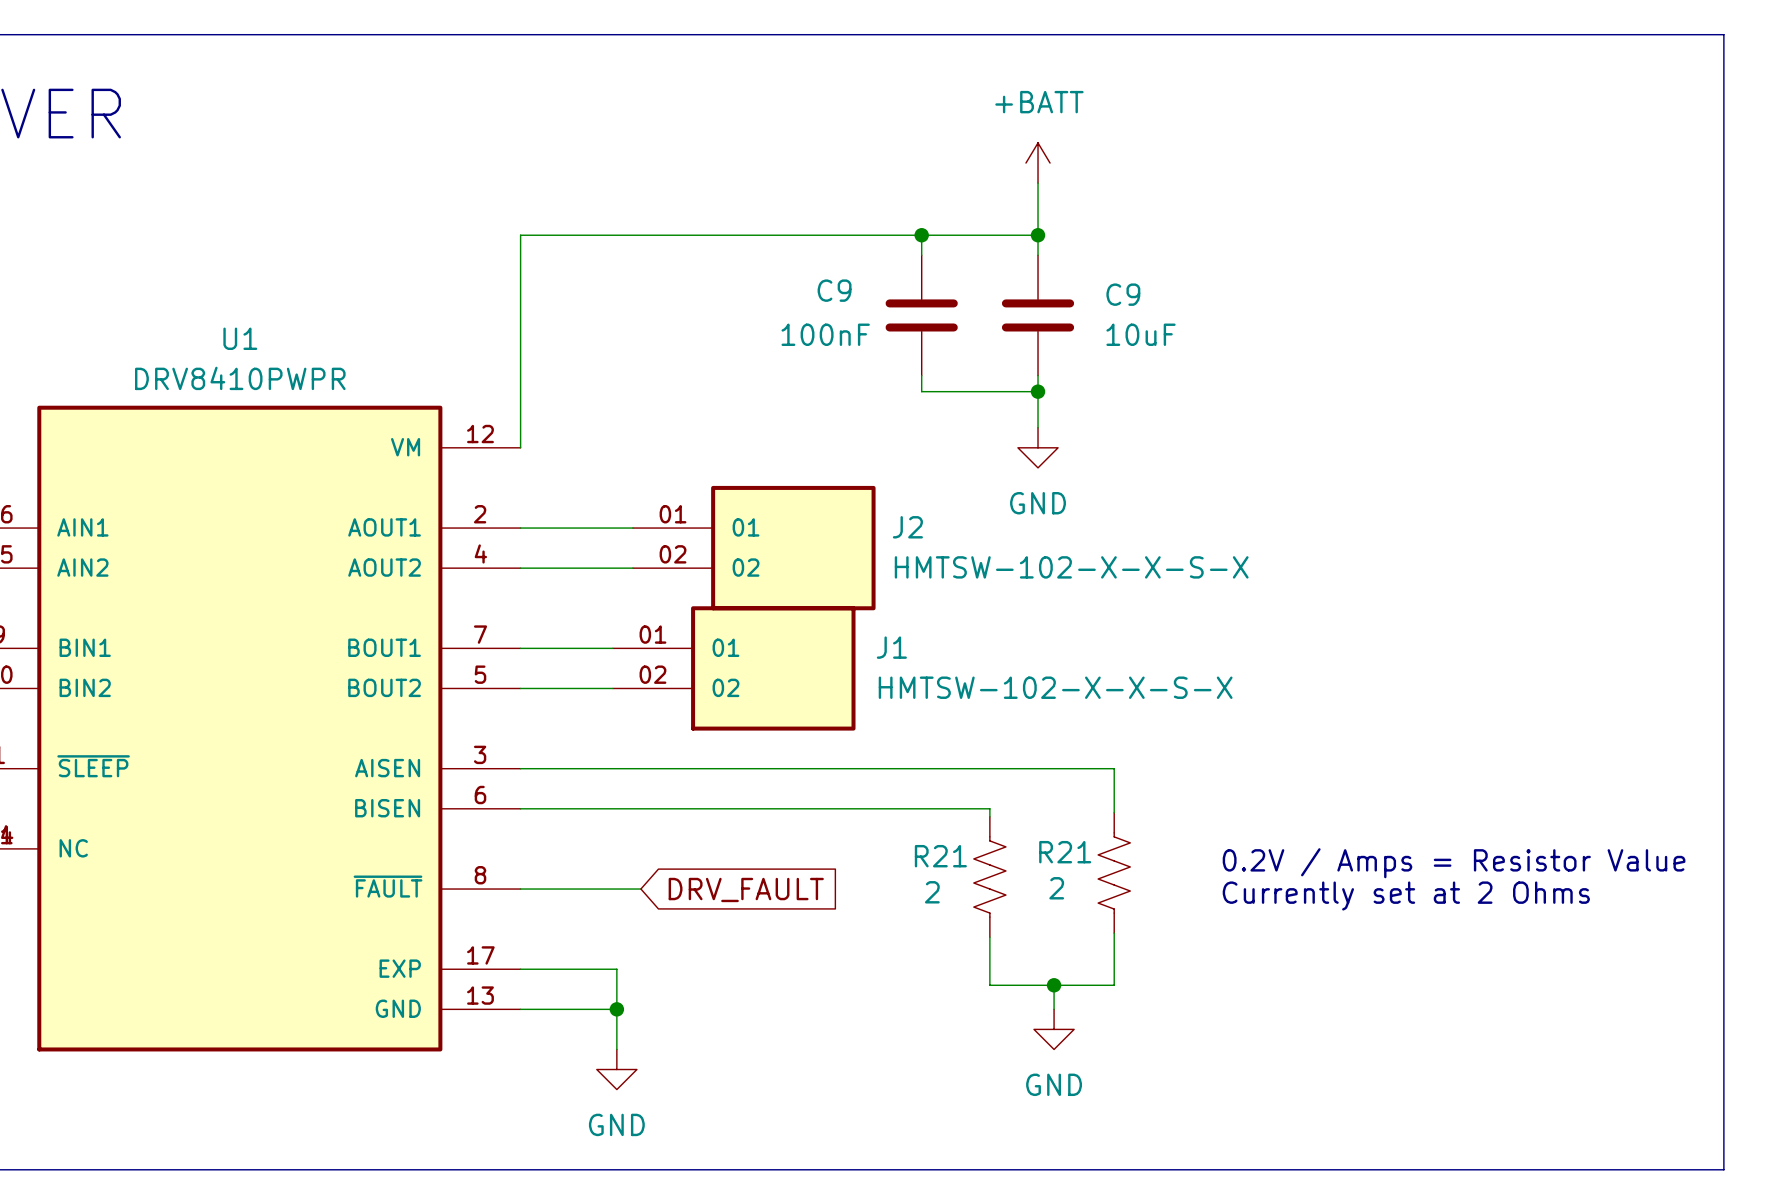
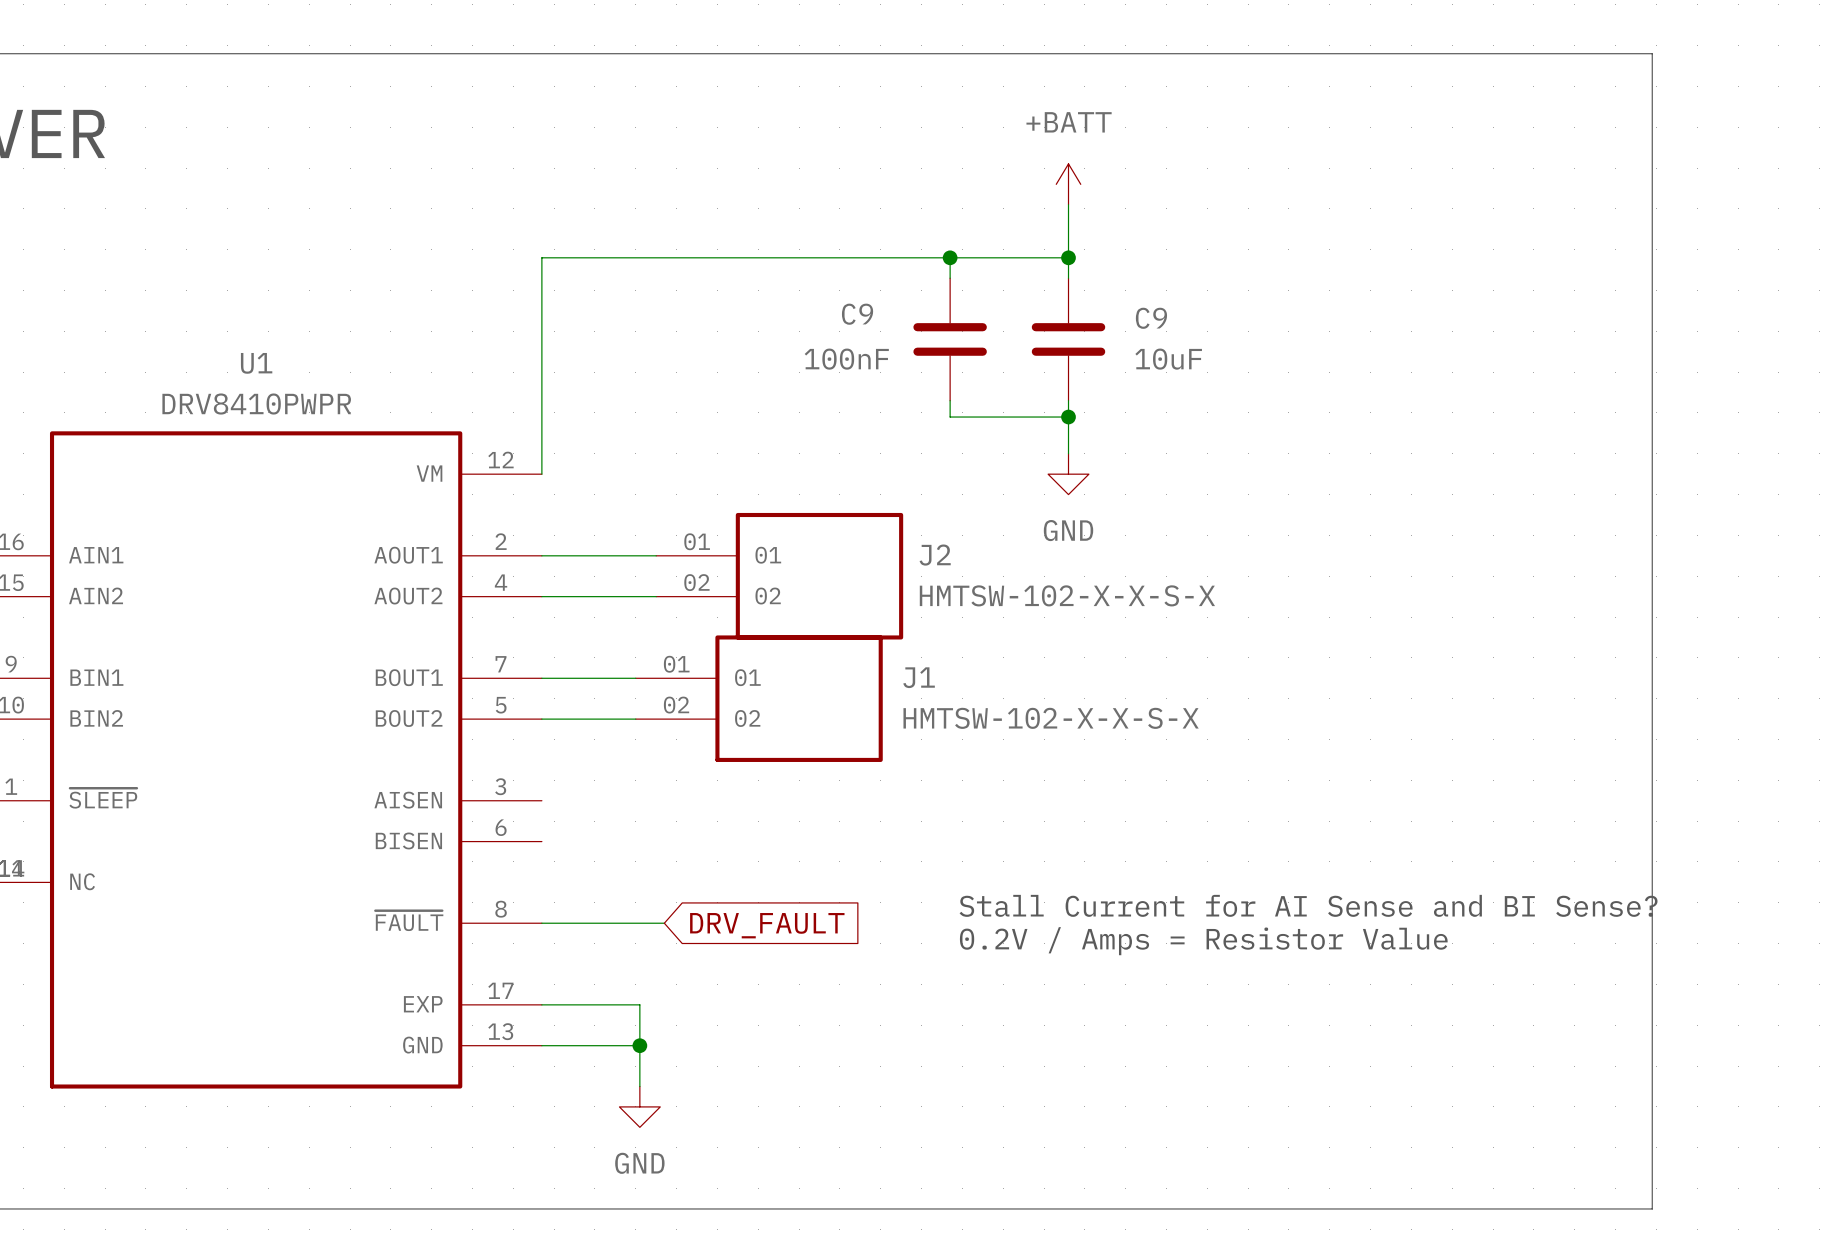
line: (1611, 34) (1723, 34) (1723, 1169) (1611, 1169) -> (1652, 53) (1652, 1208)
wire: (520, 768) (1114, 768) (1114, 812) -> none
wire: (520, 808) (989, 808) (989, 816) -> none
text position: 0.2V / Amps = Resistor Value (1454, 863) -> 0.2V / Amps = Resistor Value (1203, 941)
R21: 2 (1114, 872) -> none
text: none -> Stall Current for AI Sense and BI Sense? (1308, 905)
R21: 2 (989, 876) -> none
text: Currently set at 2 Ohms (1406, 895) -> none
wire: (1114, 933) (1114, 985) (989, 985) (989, 937) -> none
wire: (1054, 985) (1054, 1009) -> none
junction: (1054, 985) -> none
power symbol: GND (1054, 1029) -> none

